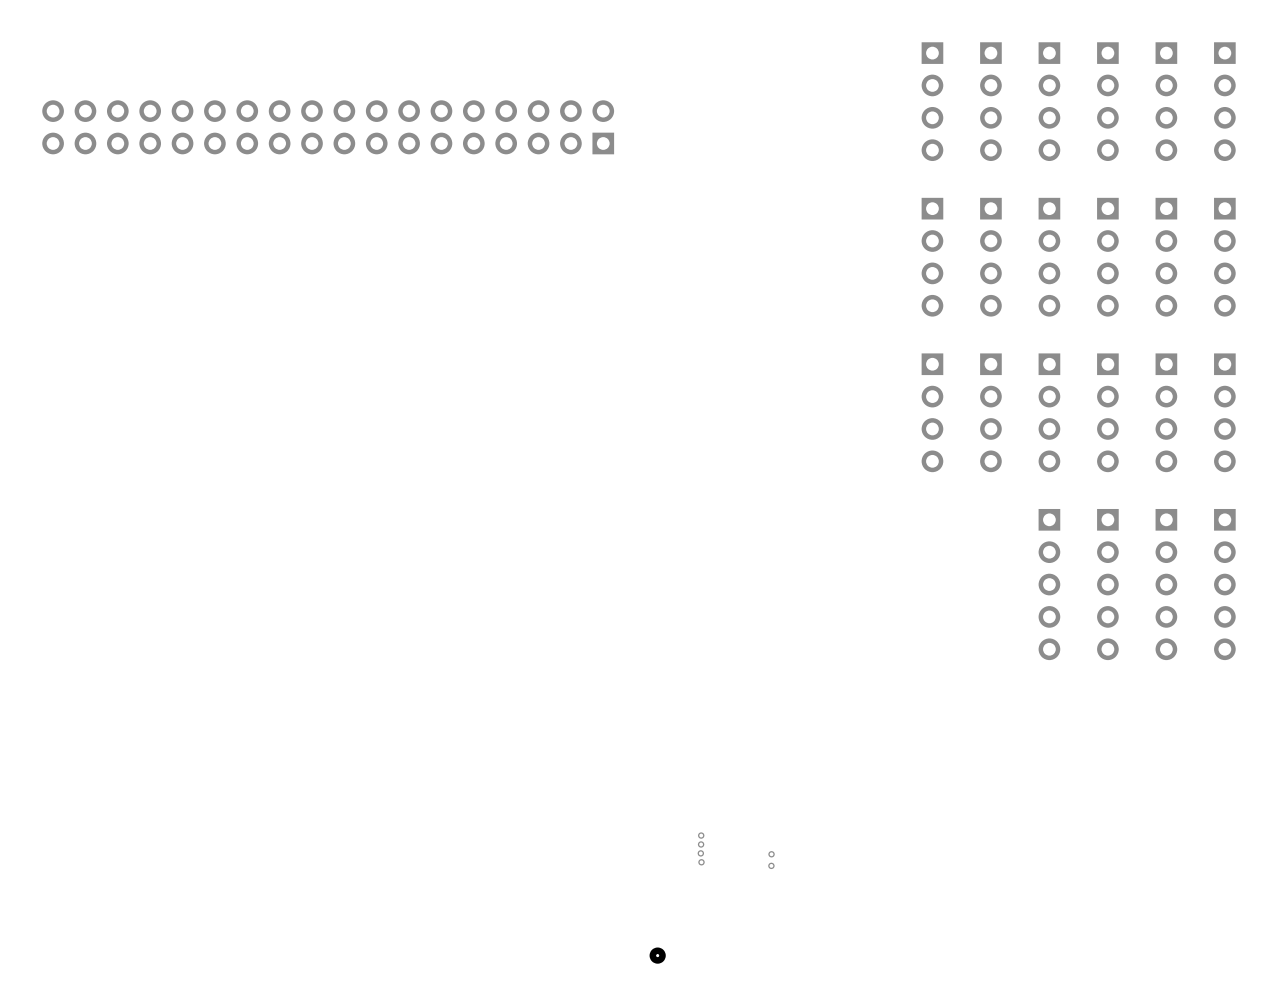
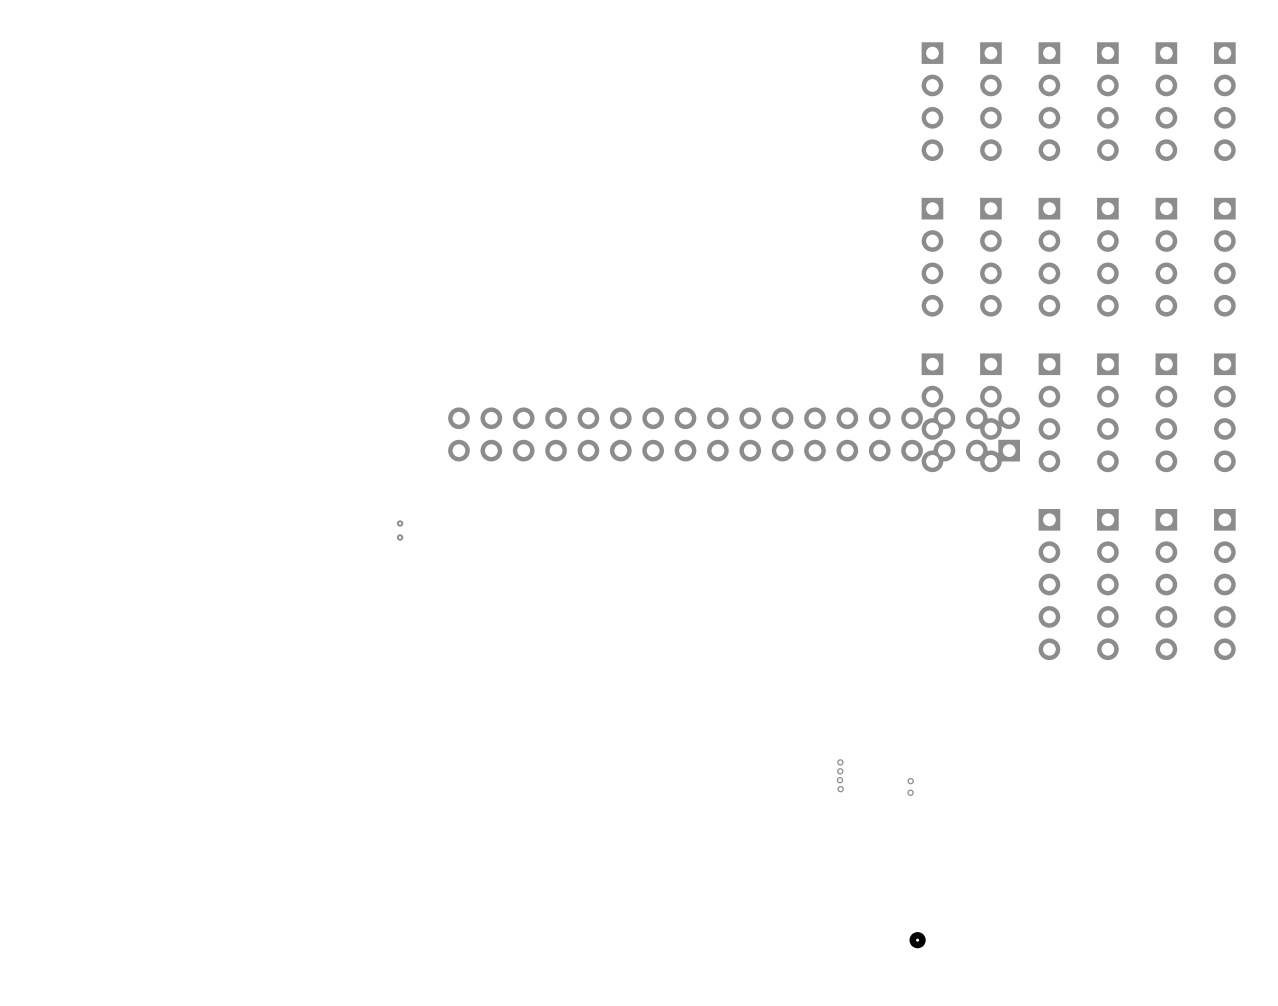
part: (328, 127) -> none
part: none -> (734, 434)
part: none -> (400, 530)
via: none -> (840, 762)
via: none -> (840, 771)
via: none -> (839, 780)
via: none -> (910, 781)
via: none -> (840, 789)
via: none -> (910, 792)
via: (701, 835) -> none
via: (701, 844) -> none
via: (700, 853) -> none
via: (771, 854) -> none
via: (701, 862) -> none
via: (771, 865) -> none
part position: (657, 955) -> (917, 940)

